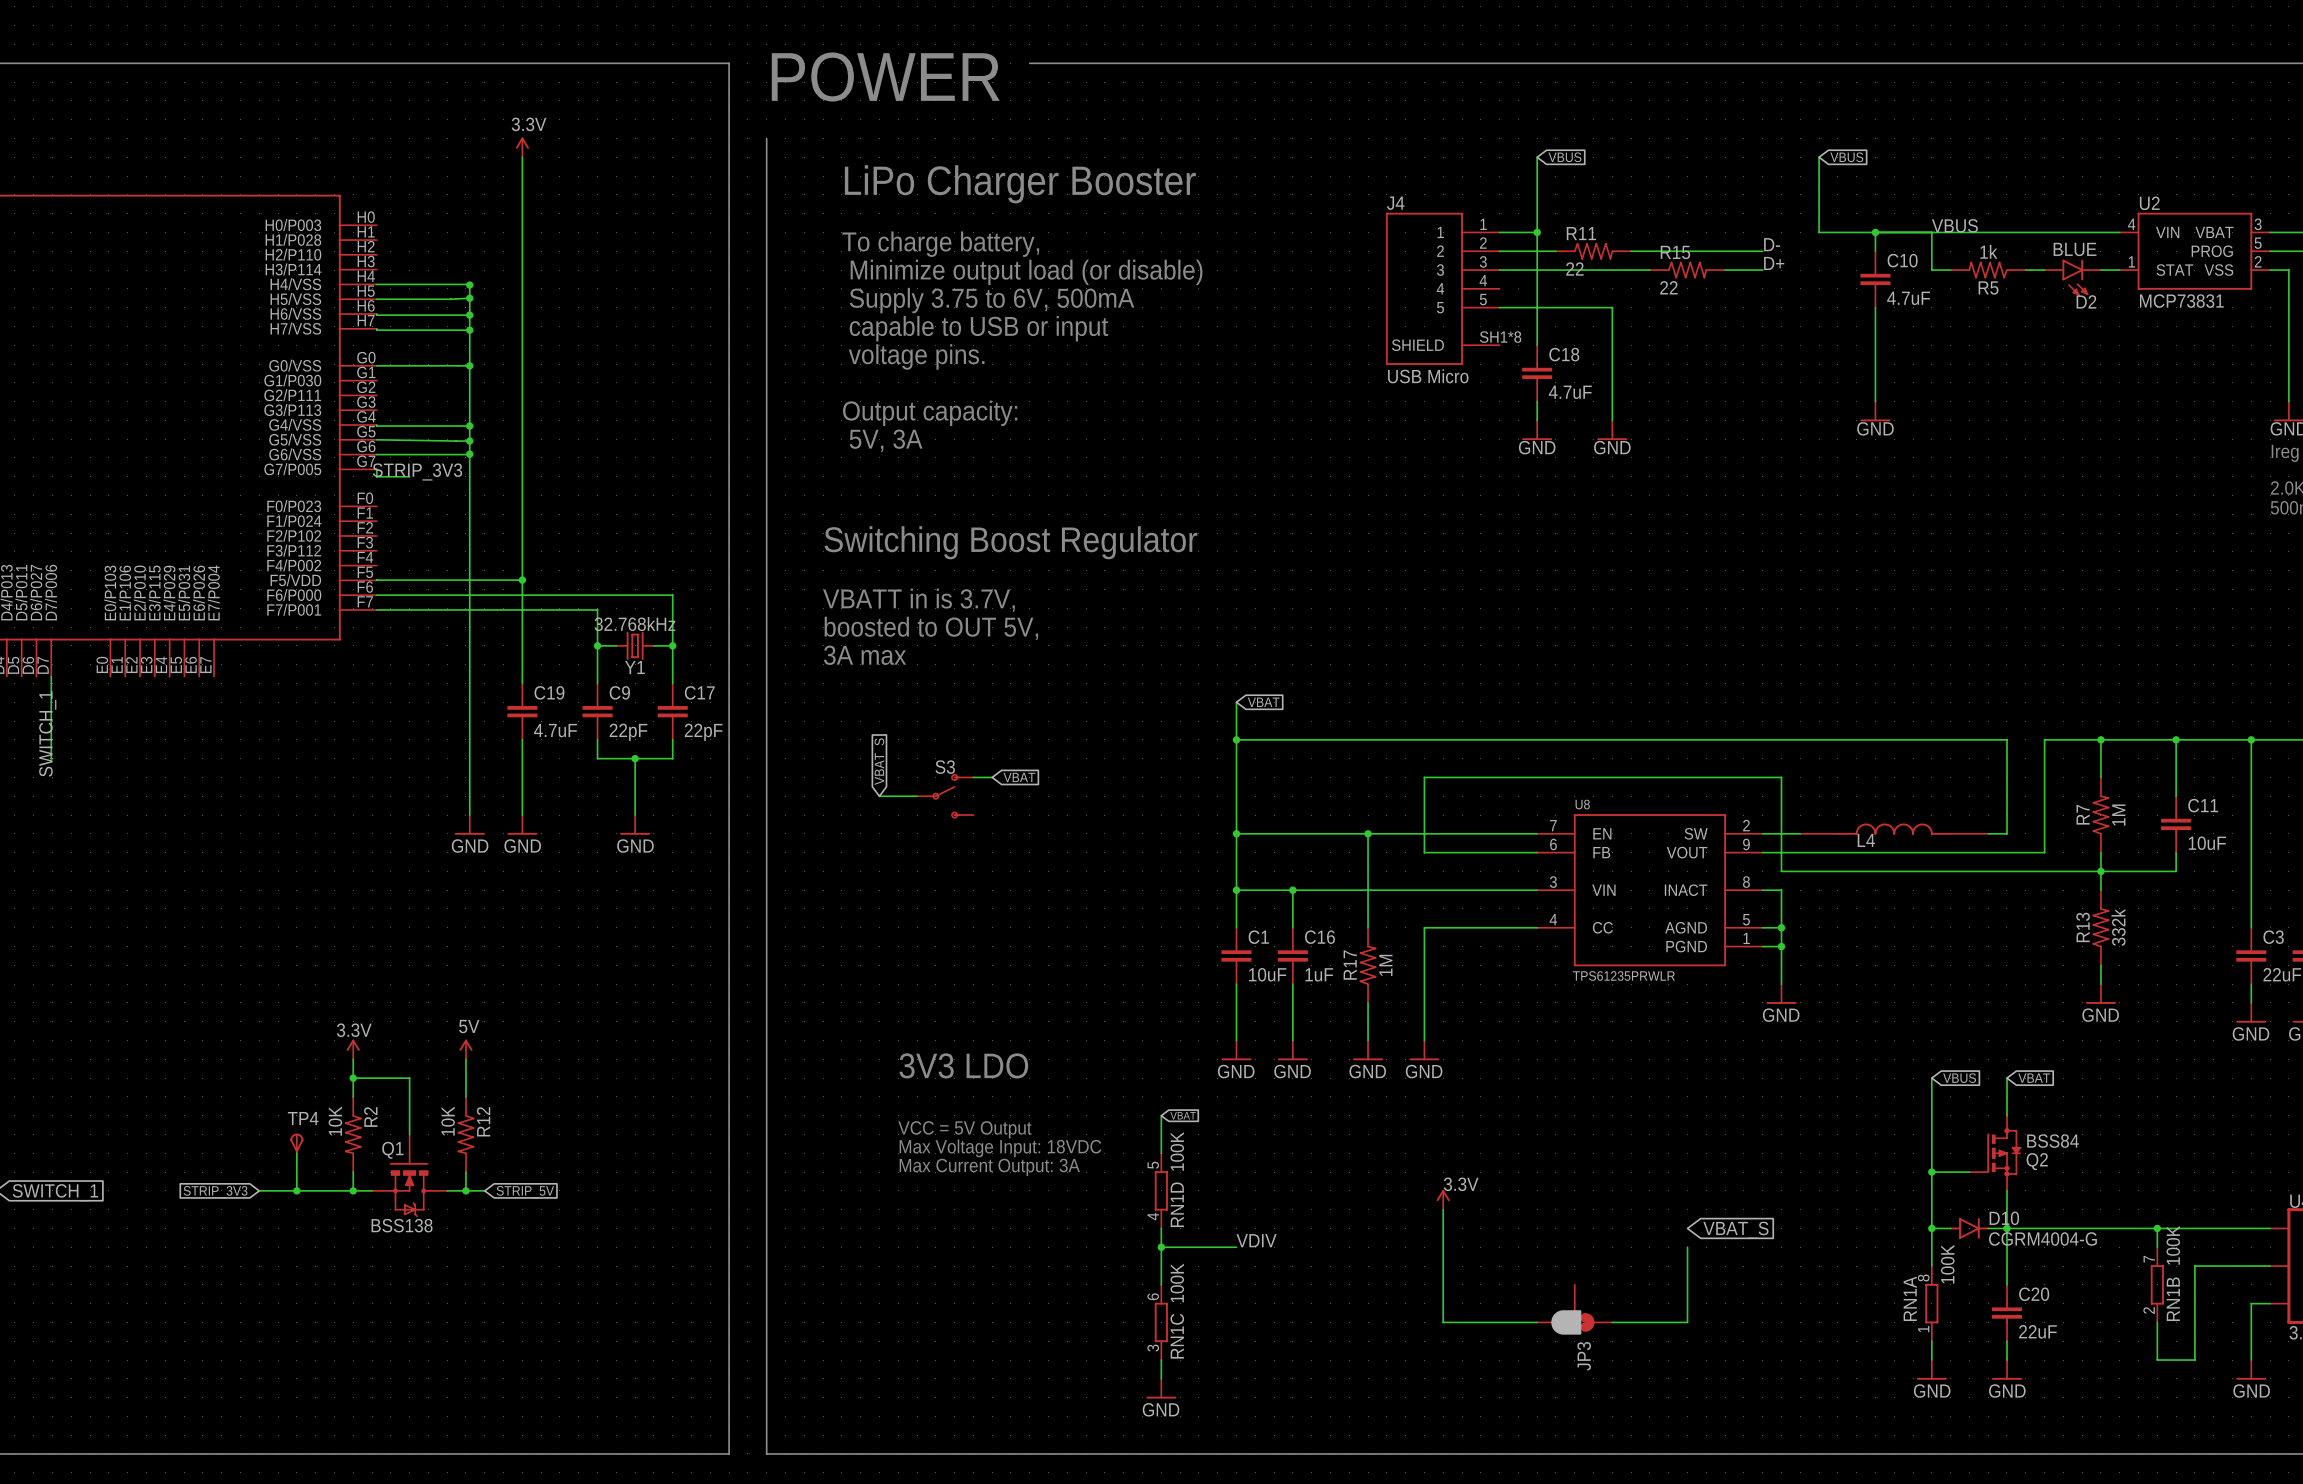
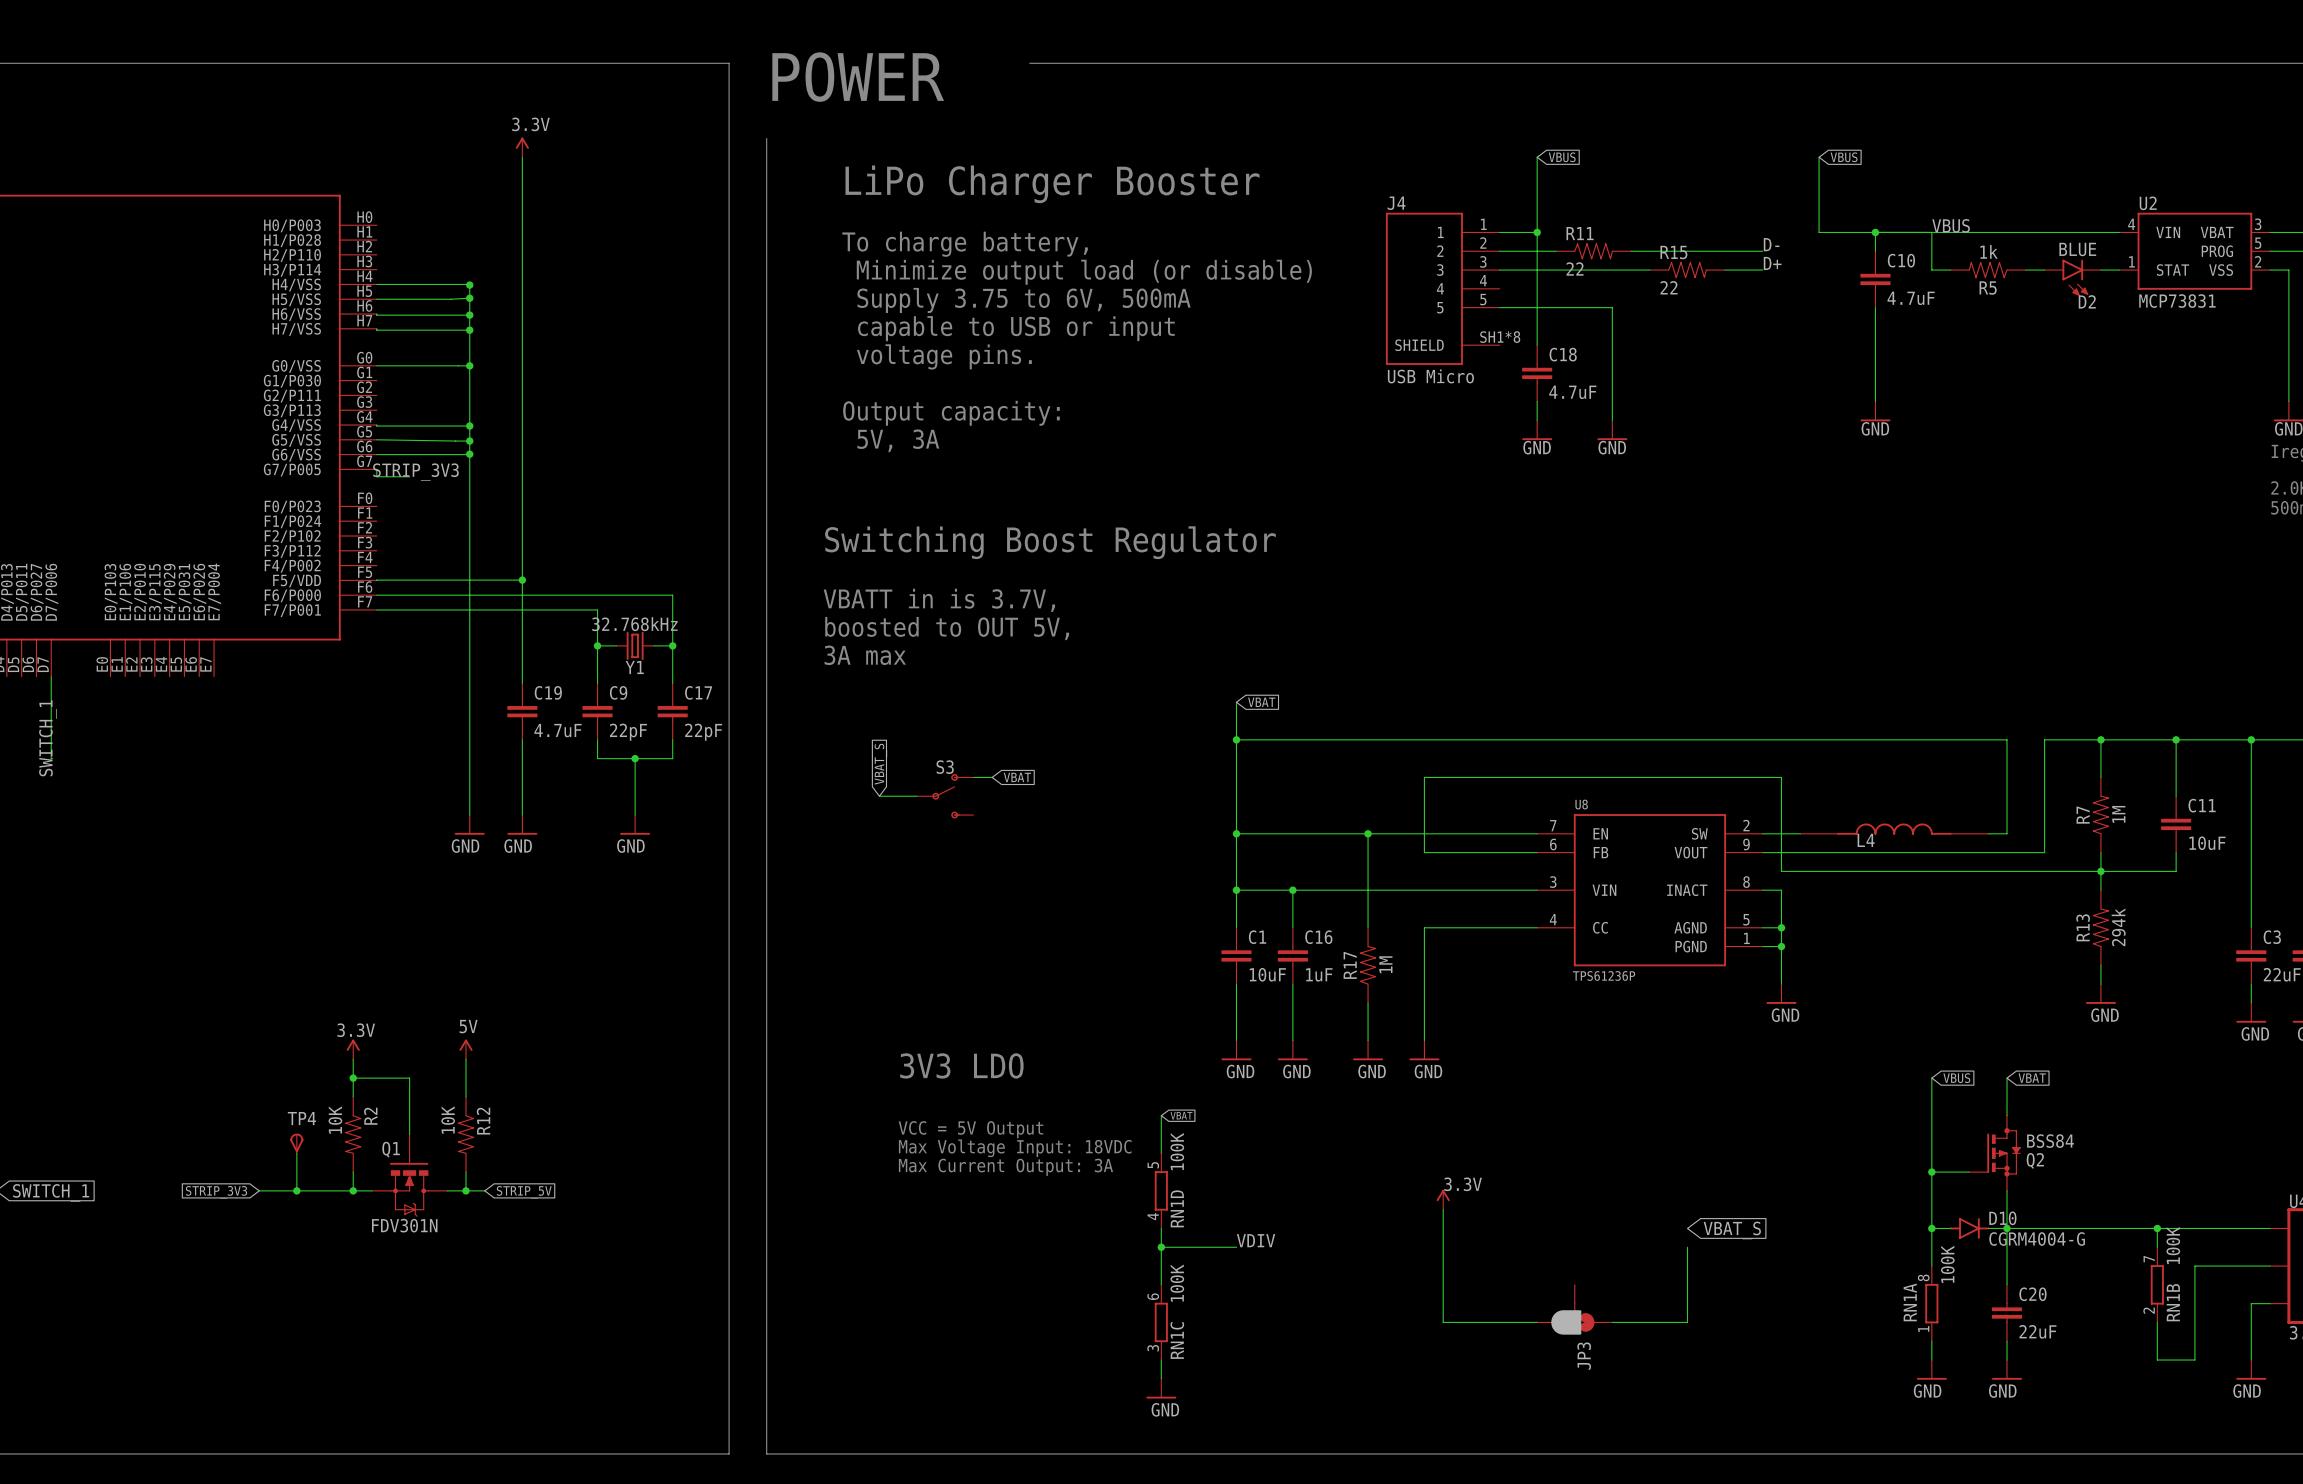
R13 value: 332k (2118, 927) -> 294k (2118, 927)
U8 value: TPS61235PRWLR (1623, 975) -> TPS61236P (1604, 975)
Q1 value: BSS138 (402, 1225) -> FDV301N (404, 1225)

